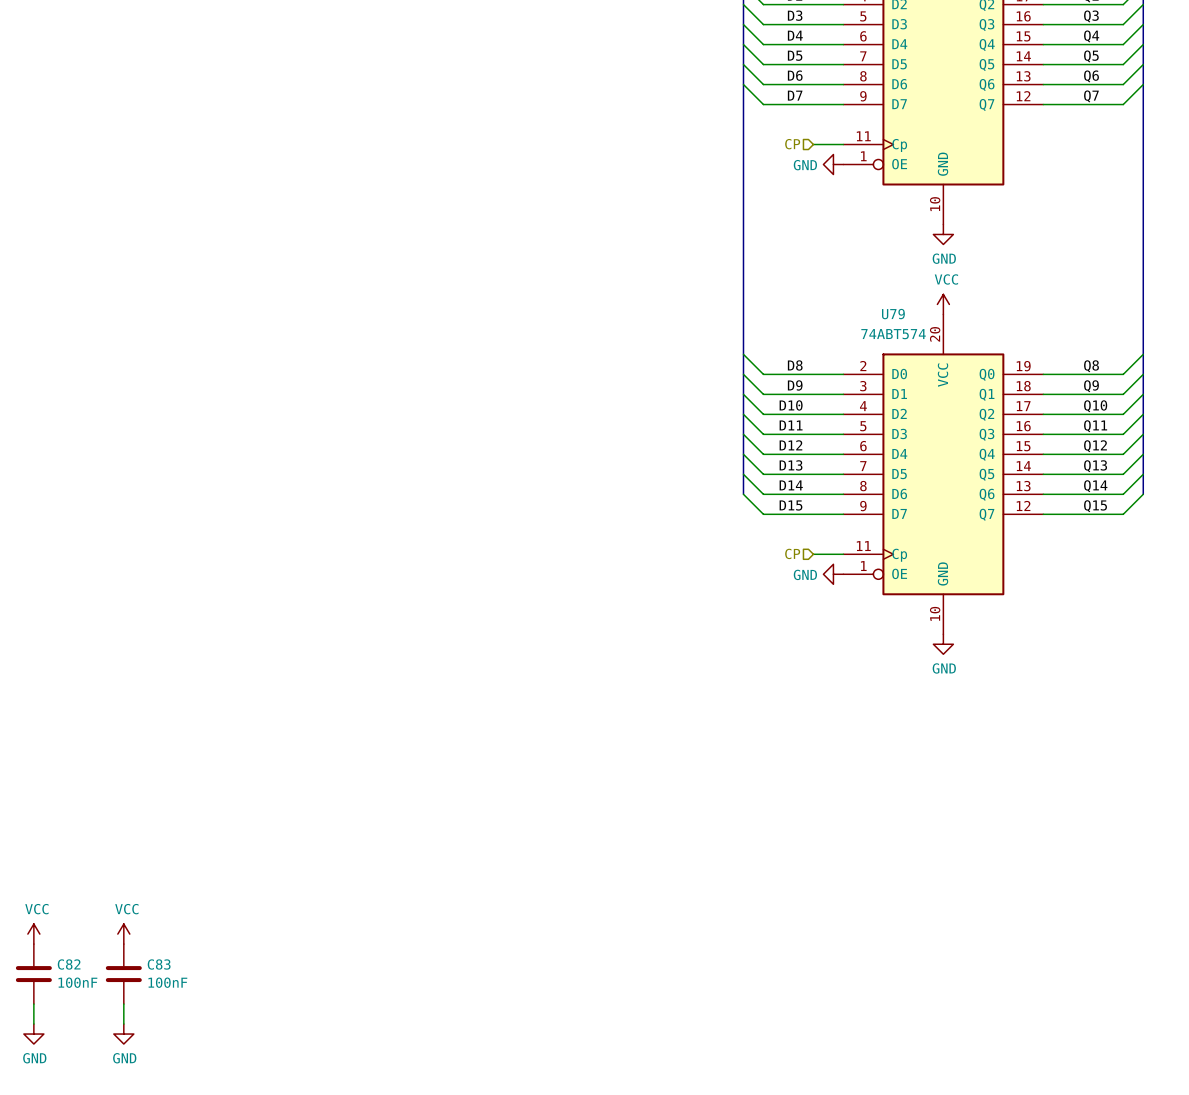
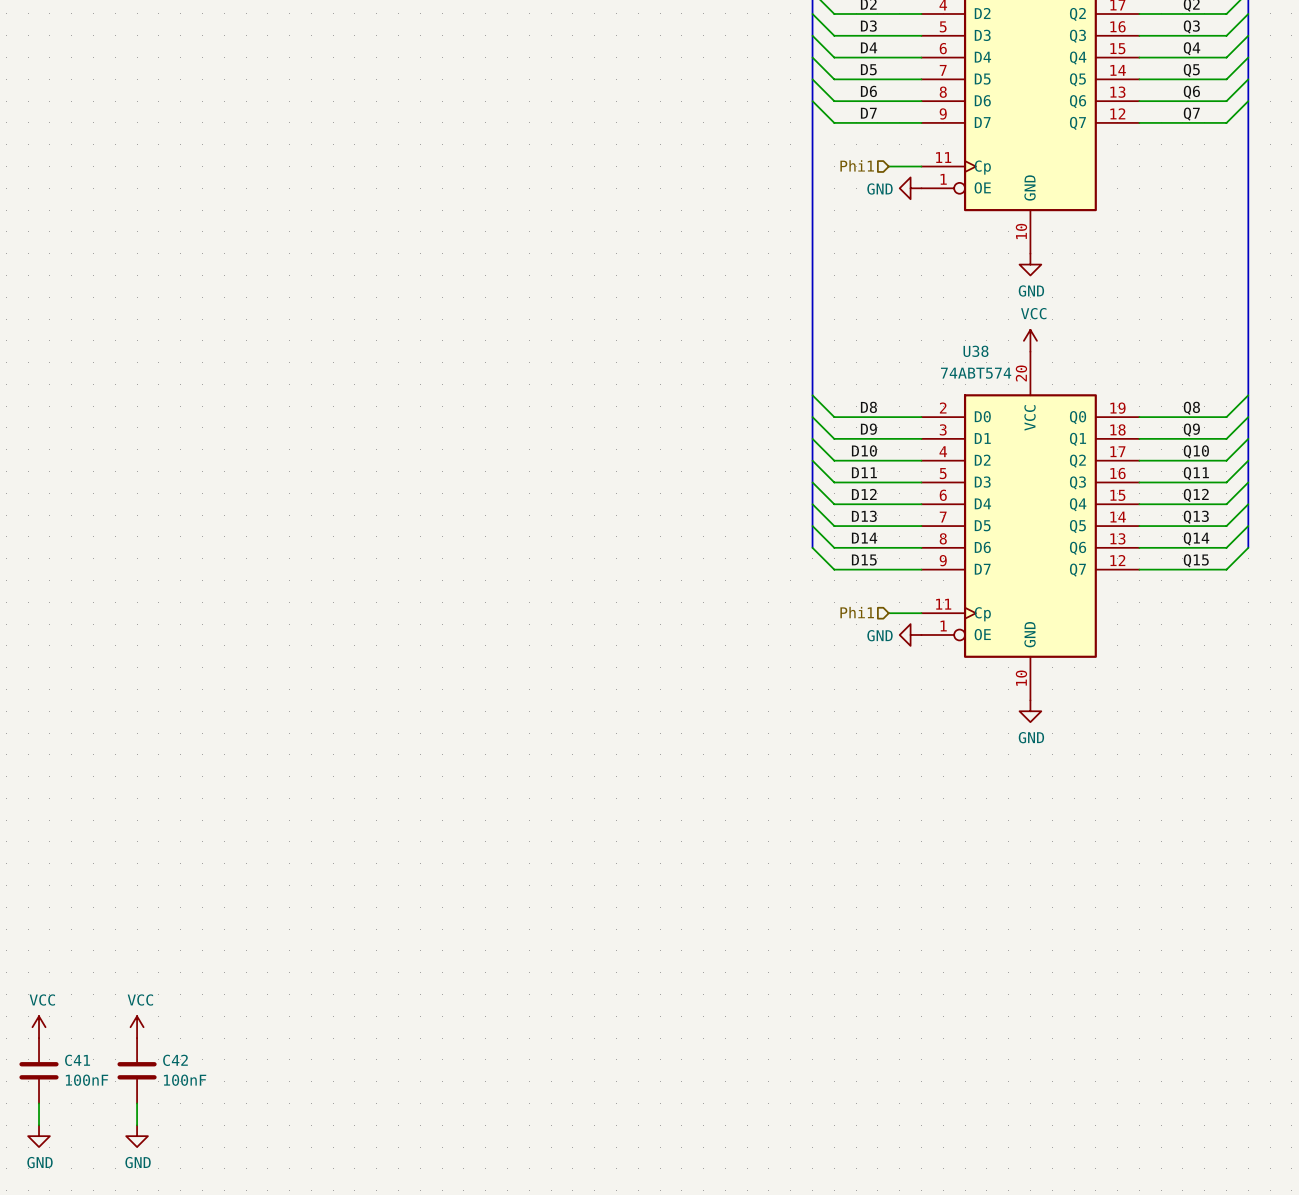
hierarchical label: CP (792, 144) -> Phi1 (857, 165)
U79 name: U79 (893, 314) -> U38 (976, 351)
hierarchical label: CP (792, 553) -> Phi1 (857, 612)
C82 name: C82 (69, 964) -> C41 (77, 1060)
C83 name: C83 (159, 964) -> C42 (175, 1060)

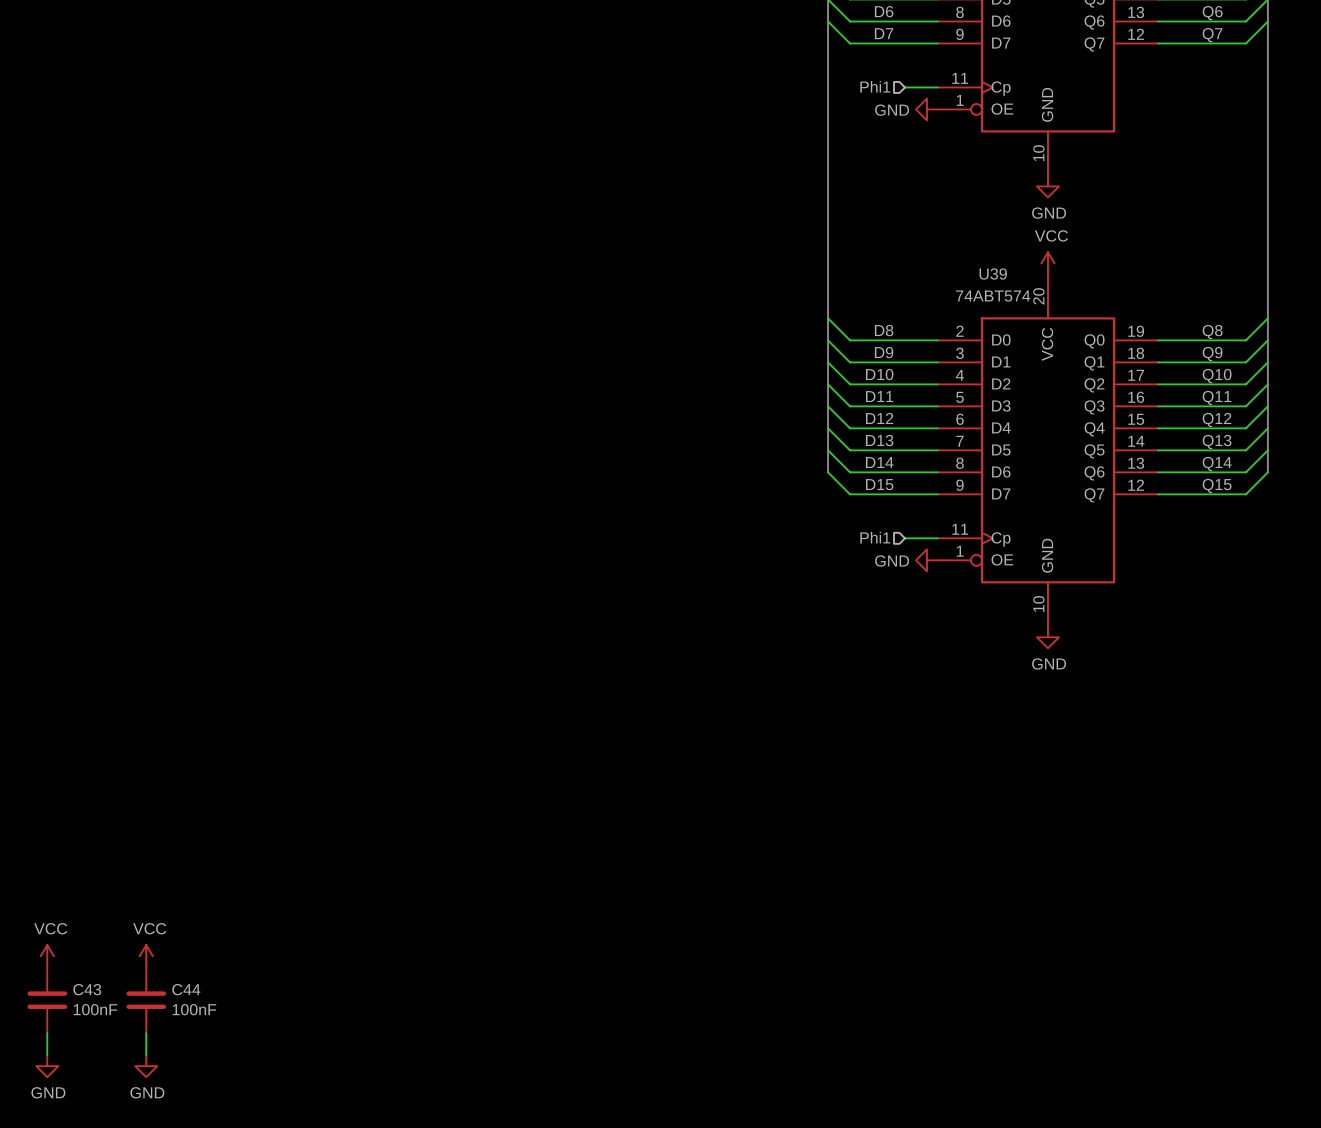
U38 name: U38 (976, 351) -> U39 (993, 273)
C41 name: C41 (77, 1060) -> C43 (87, 989)
C42 name: C42 (175, 1060) -> C44 (186, 989)

